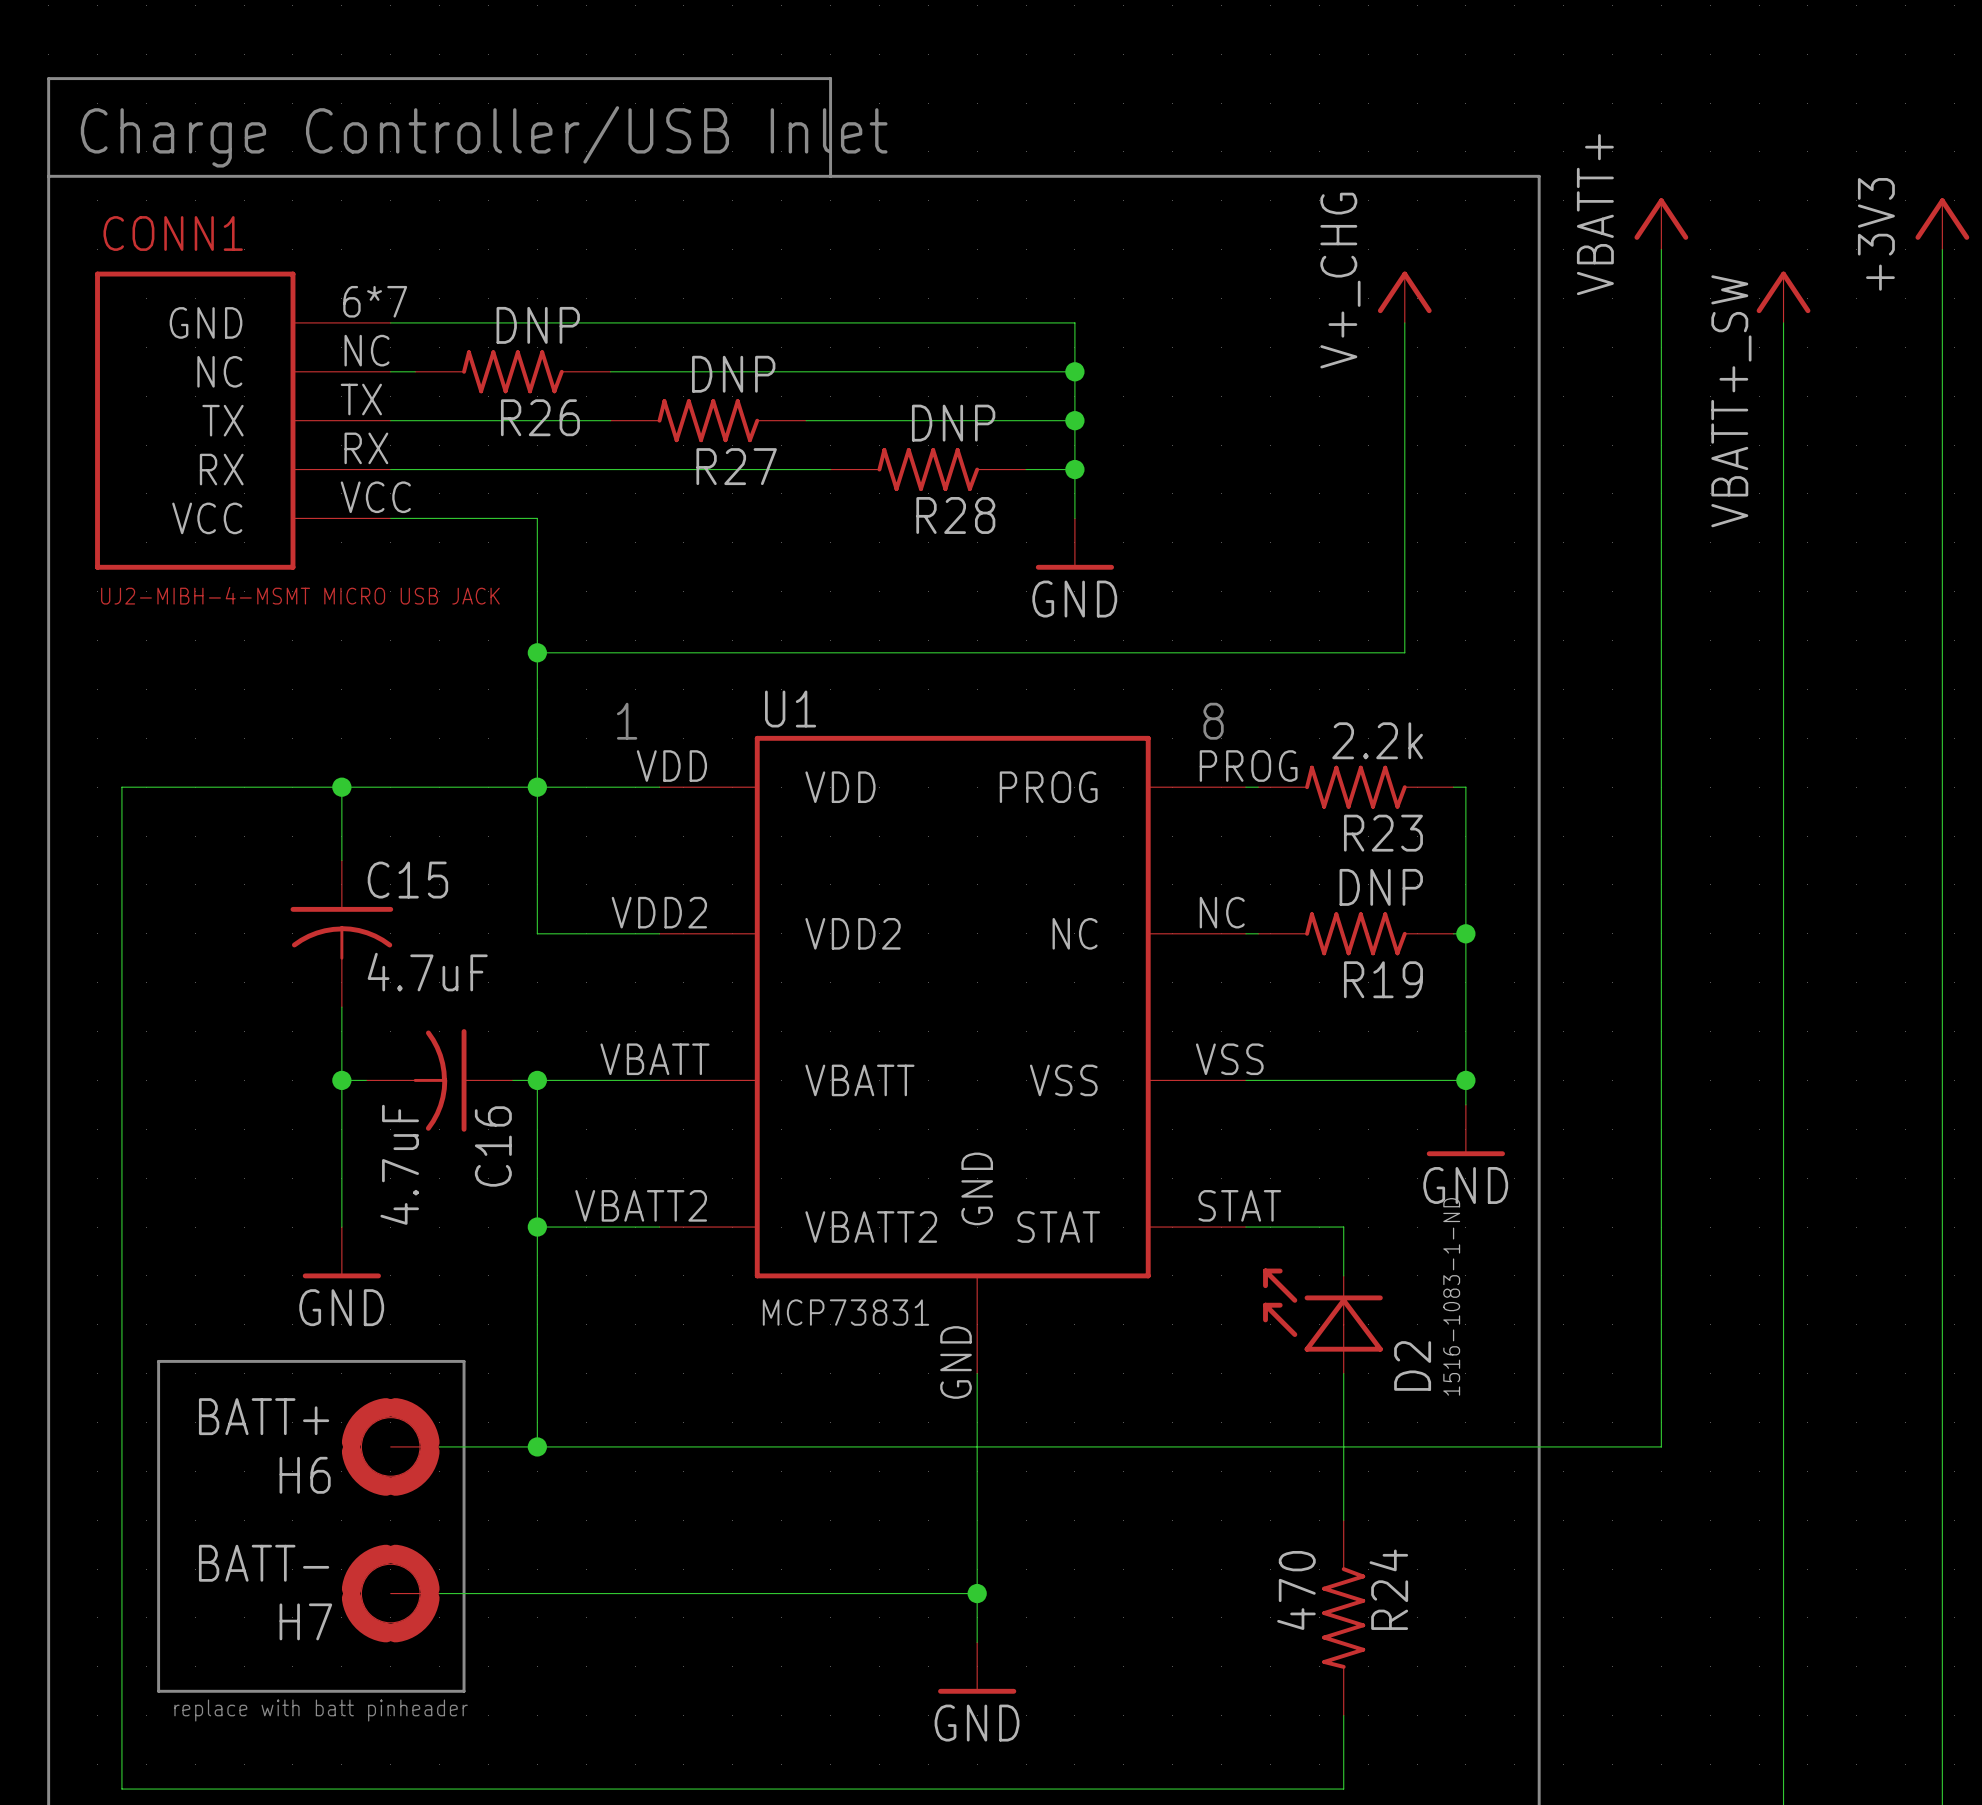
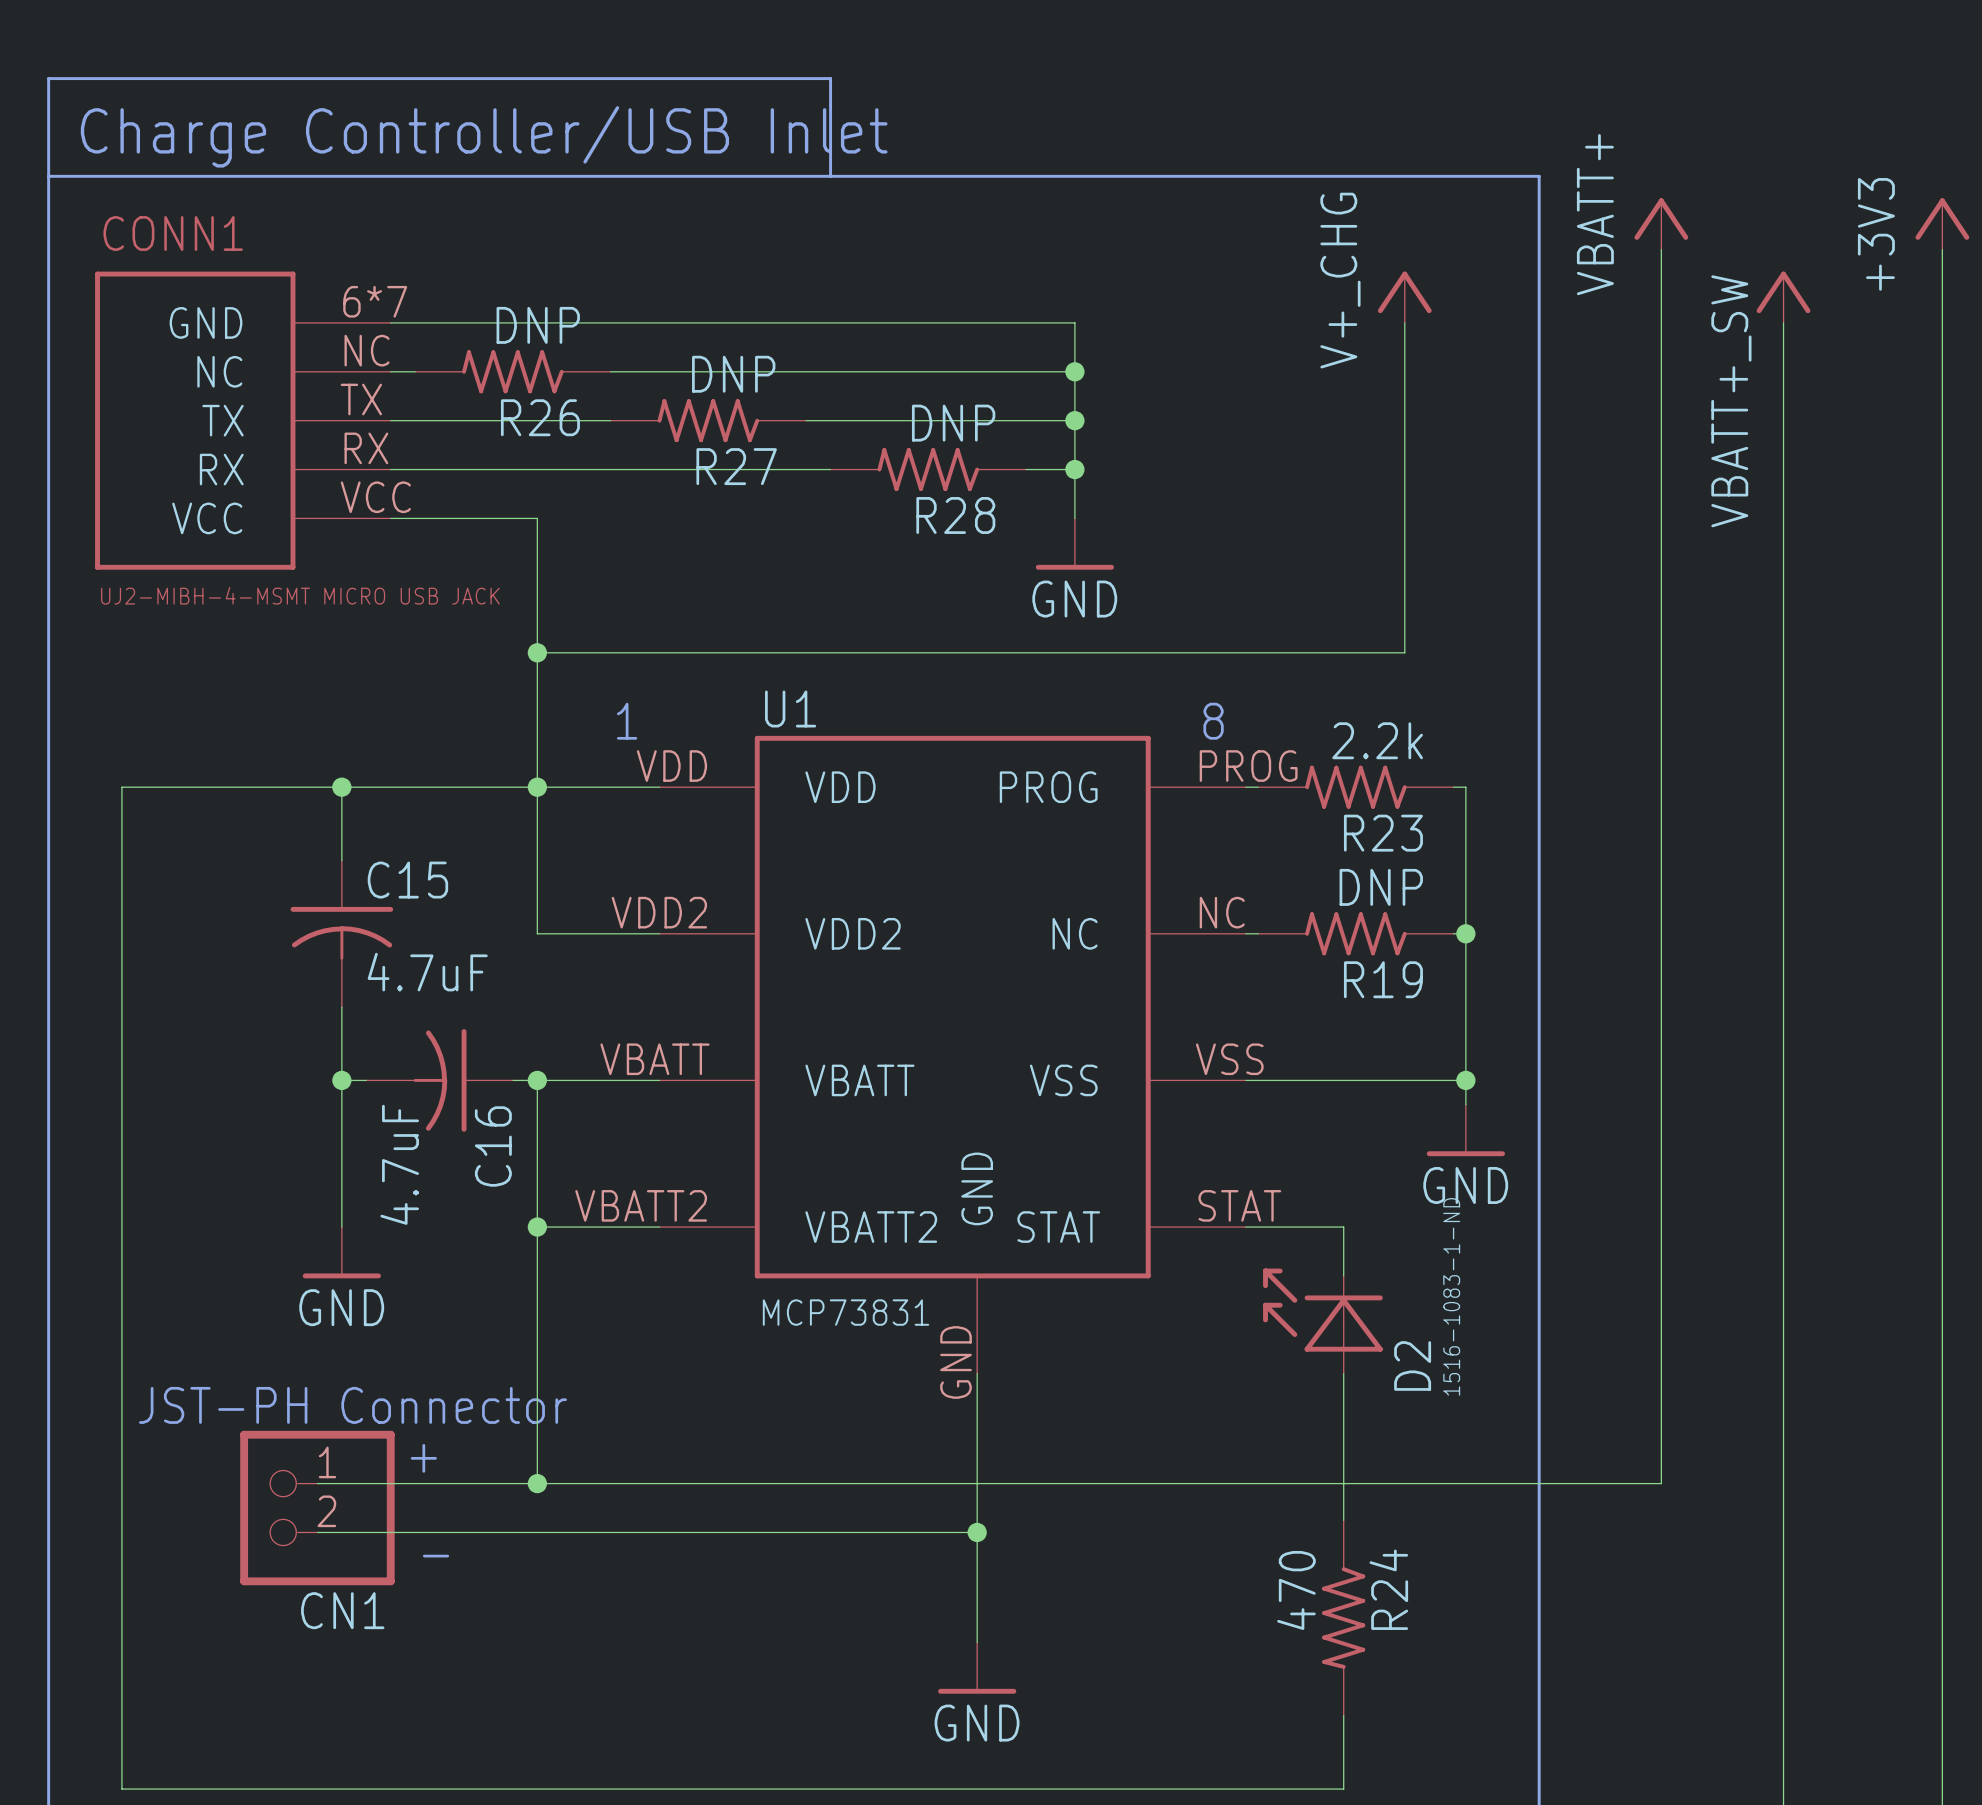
line: (158, 1361) (158, 1691) (464, 1691) (464, 1361) (158, 1361) -> none
text: none -> JST-PH Connector (352, 1405)
H6: BATT+ (390, 1446) -> none
wire: (439, 1446) (1661, 1446) -> (317, 1483) (1661, 1483) (1661, 1446)
wire: none -> (537, 1446) (537, 1483)
junction position: (537, 1446) -> (537, 1483)
text: none -> + (423, 1458)
CN1: none -> (317, 1508)
wire: none -> (317, 1532) (977, 1532)
text: none -> - (436, 1556)
H7: BATT- (390, 1593) -> none
wire: (439, 1593) (977, 1593) -> none
junction position: (977, 1593) -> (977, 1532)
text: replace with batt pinheader (321, 1710) -> none

